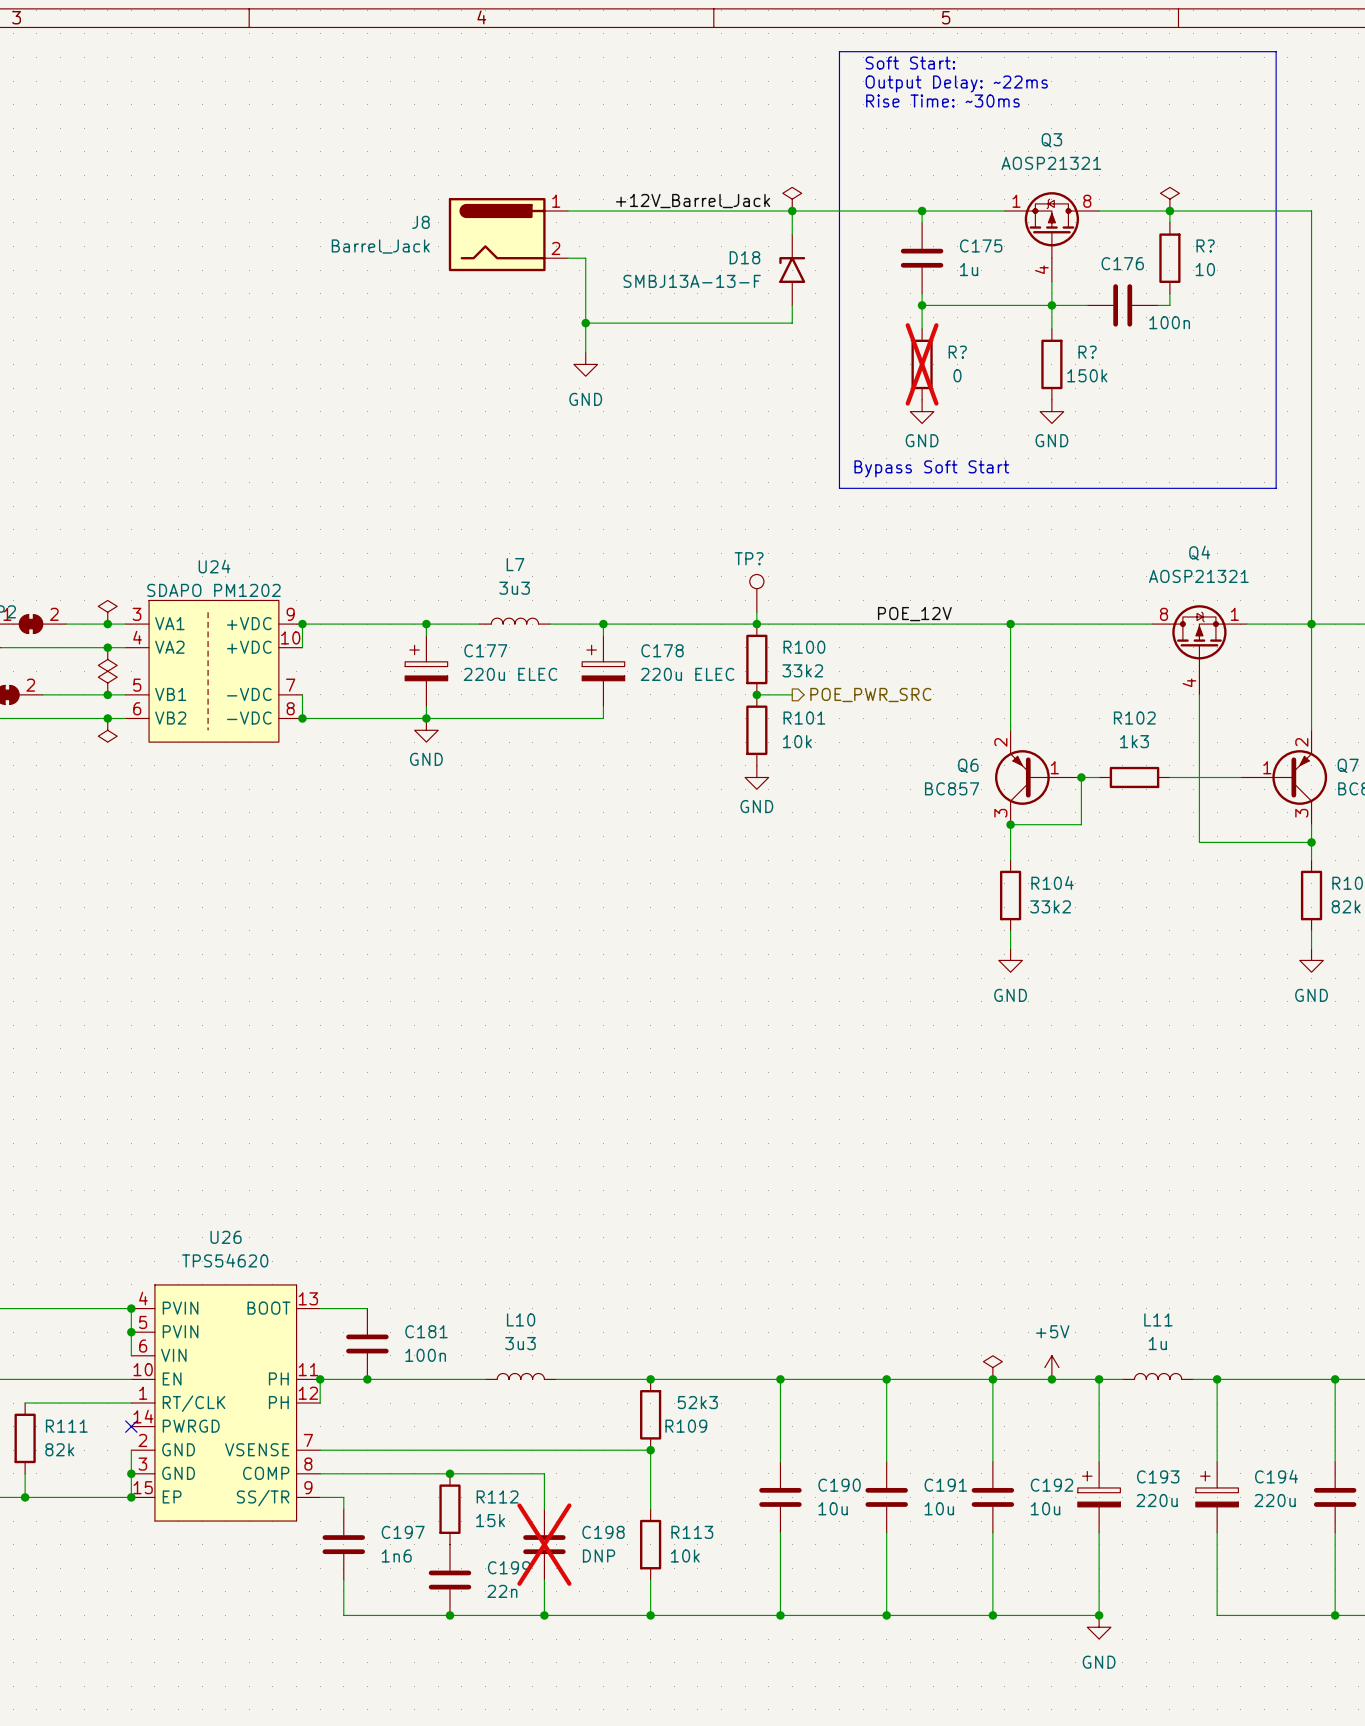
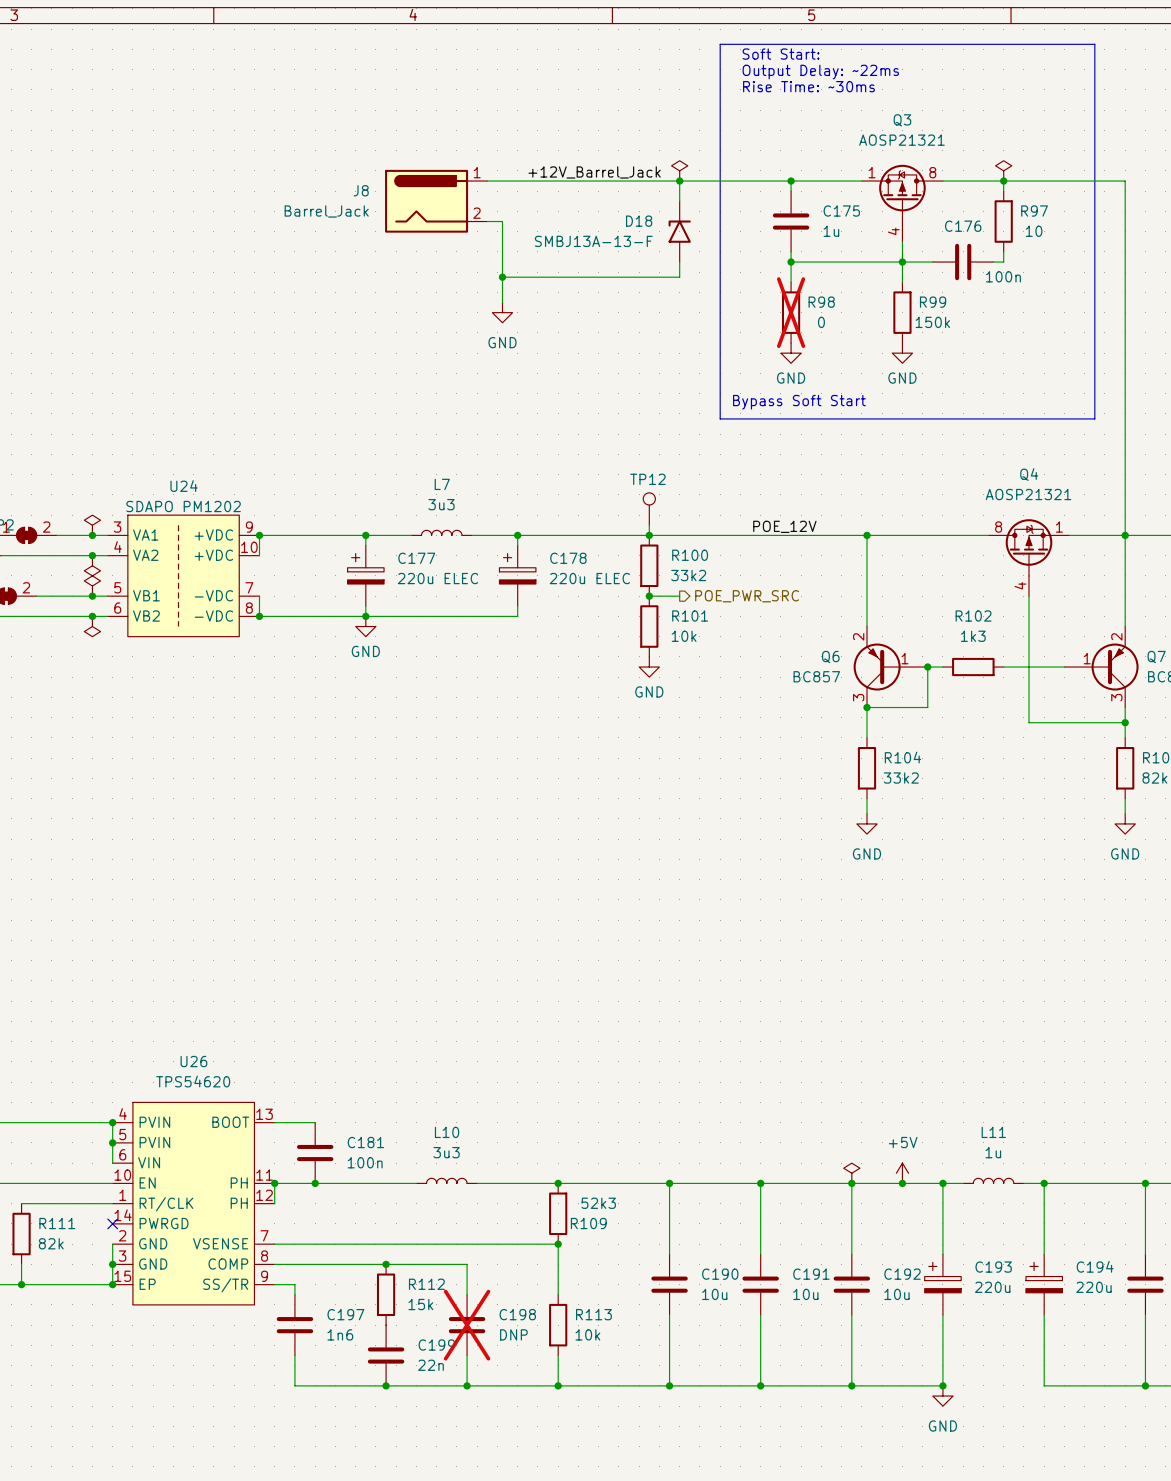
R? name: R? (1205, 245) -> R97 (1034, 211)
R? name: R? (957, 352) -> R98 (821, 302)
R? name: R? (1087, 352) -> R99 (933, 302)
TP? name: TP? (749, 558) -> TP12 (647, 479)

